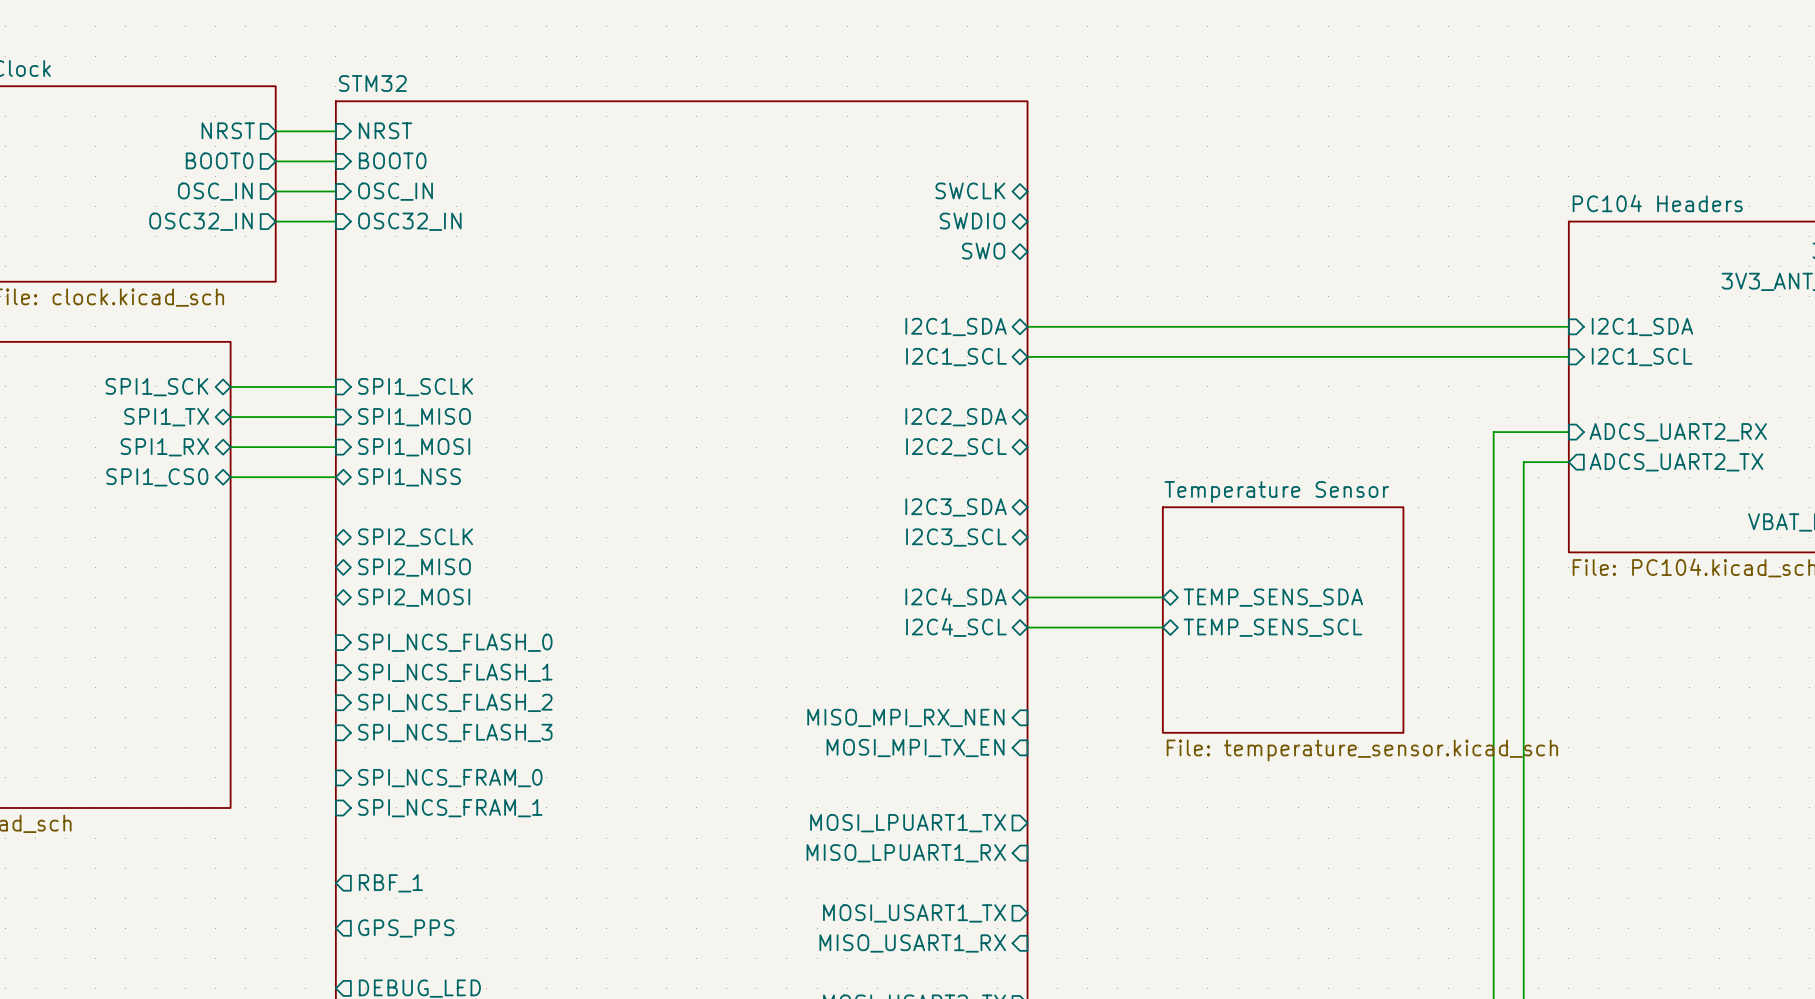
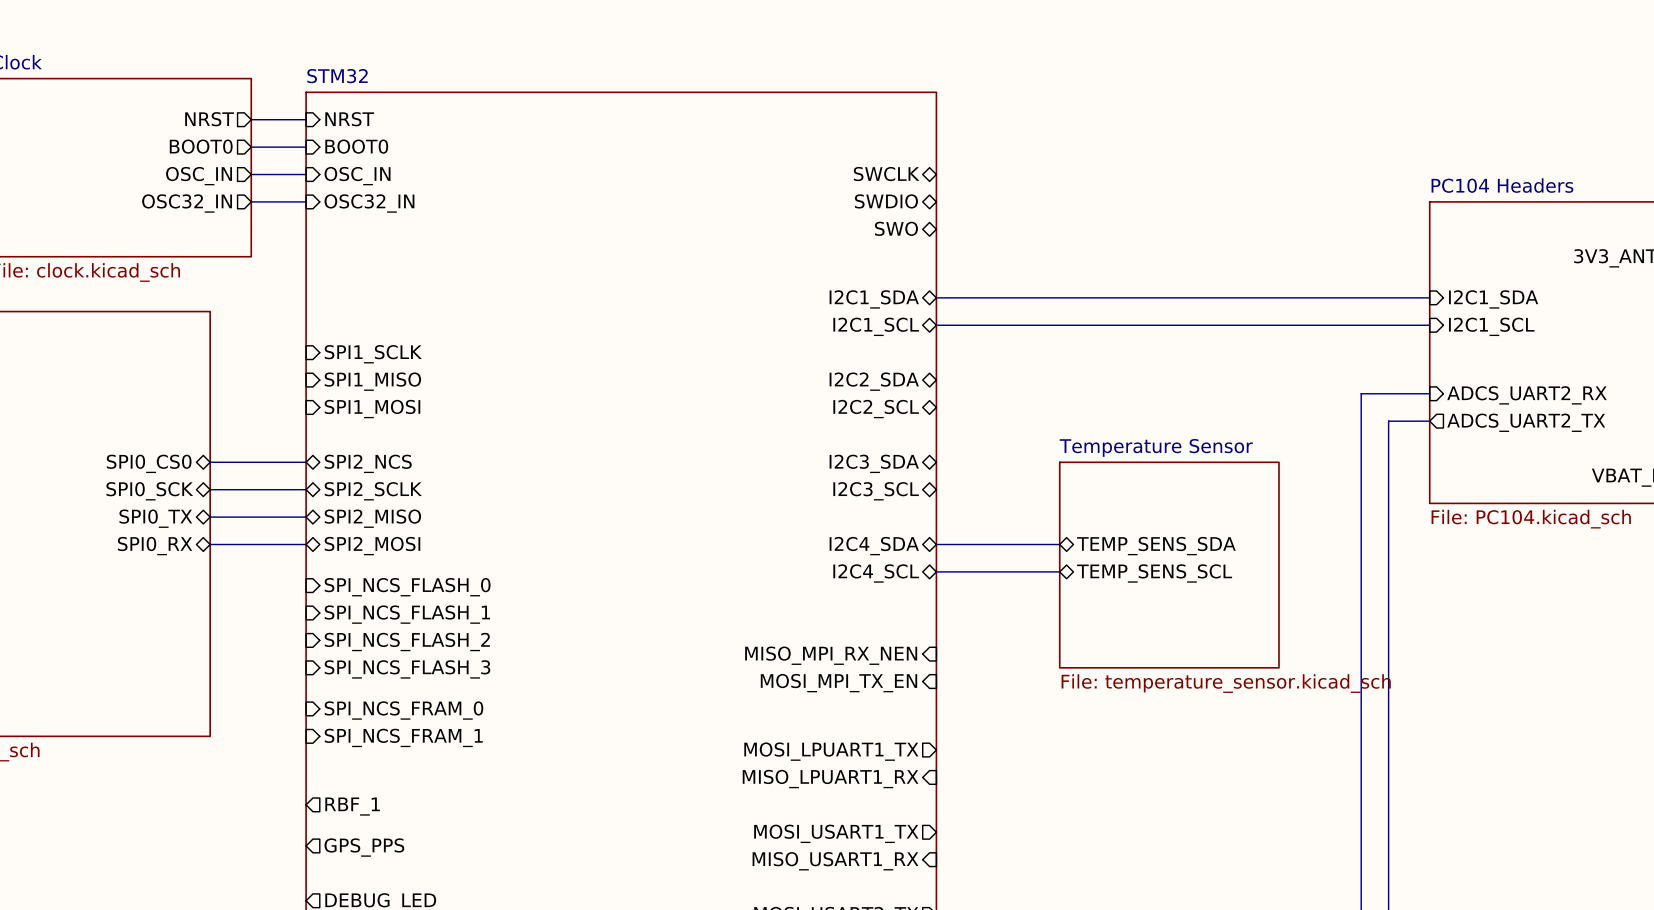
wire: (230, 386) (335, 386) -> (210, 462) (306, 462)
sheet pin: SPI1_SCK (156, 387) -> none
sheet pin: SPI1_TX (166, 417) -> none
wire: (230, 417) (335, 417) -> (210, 489) (306, 489)
sheet pin: SPI1_RX (164, 447) -> none
wire: (230, 447) (335, 447) -> (210, 517) (306, 517)
sheet pin: SPI1_CS0 (157, 477) -> SPI0_CS0 (149, 463)
wire: (230, 477) (335, 477) -> (210, 544) (306, 544)
sheet pin: SPI1_NSS (409, 477) -> SPI2_NCS (368, 463)
sheet pin: none -> SPI0_SCK (149, 491)
sheet pin: none -> SPI0_TX (155, 518)
sheet pin: none -> SPI0_RX (155, 546)

